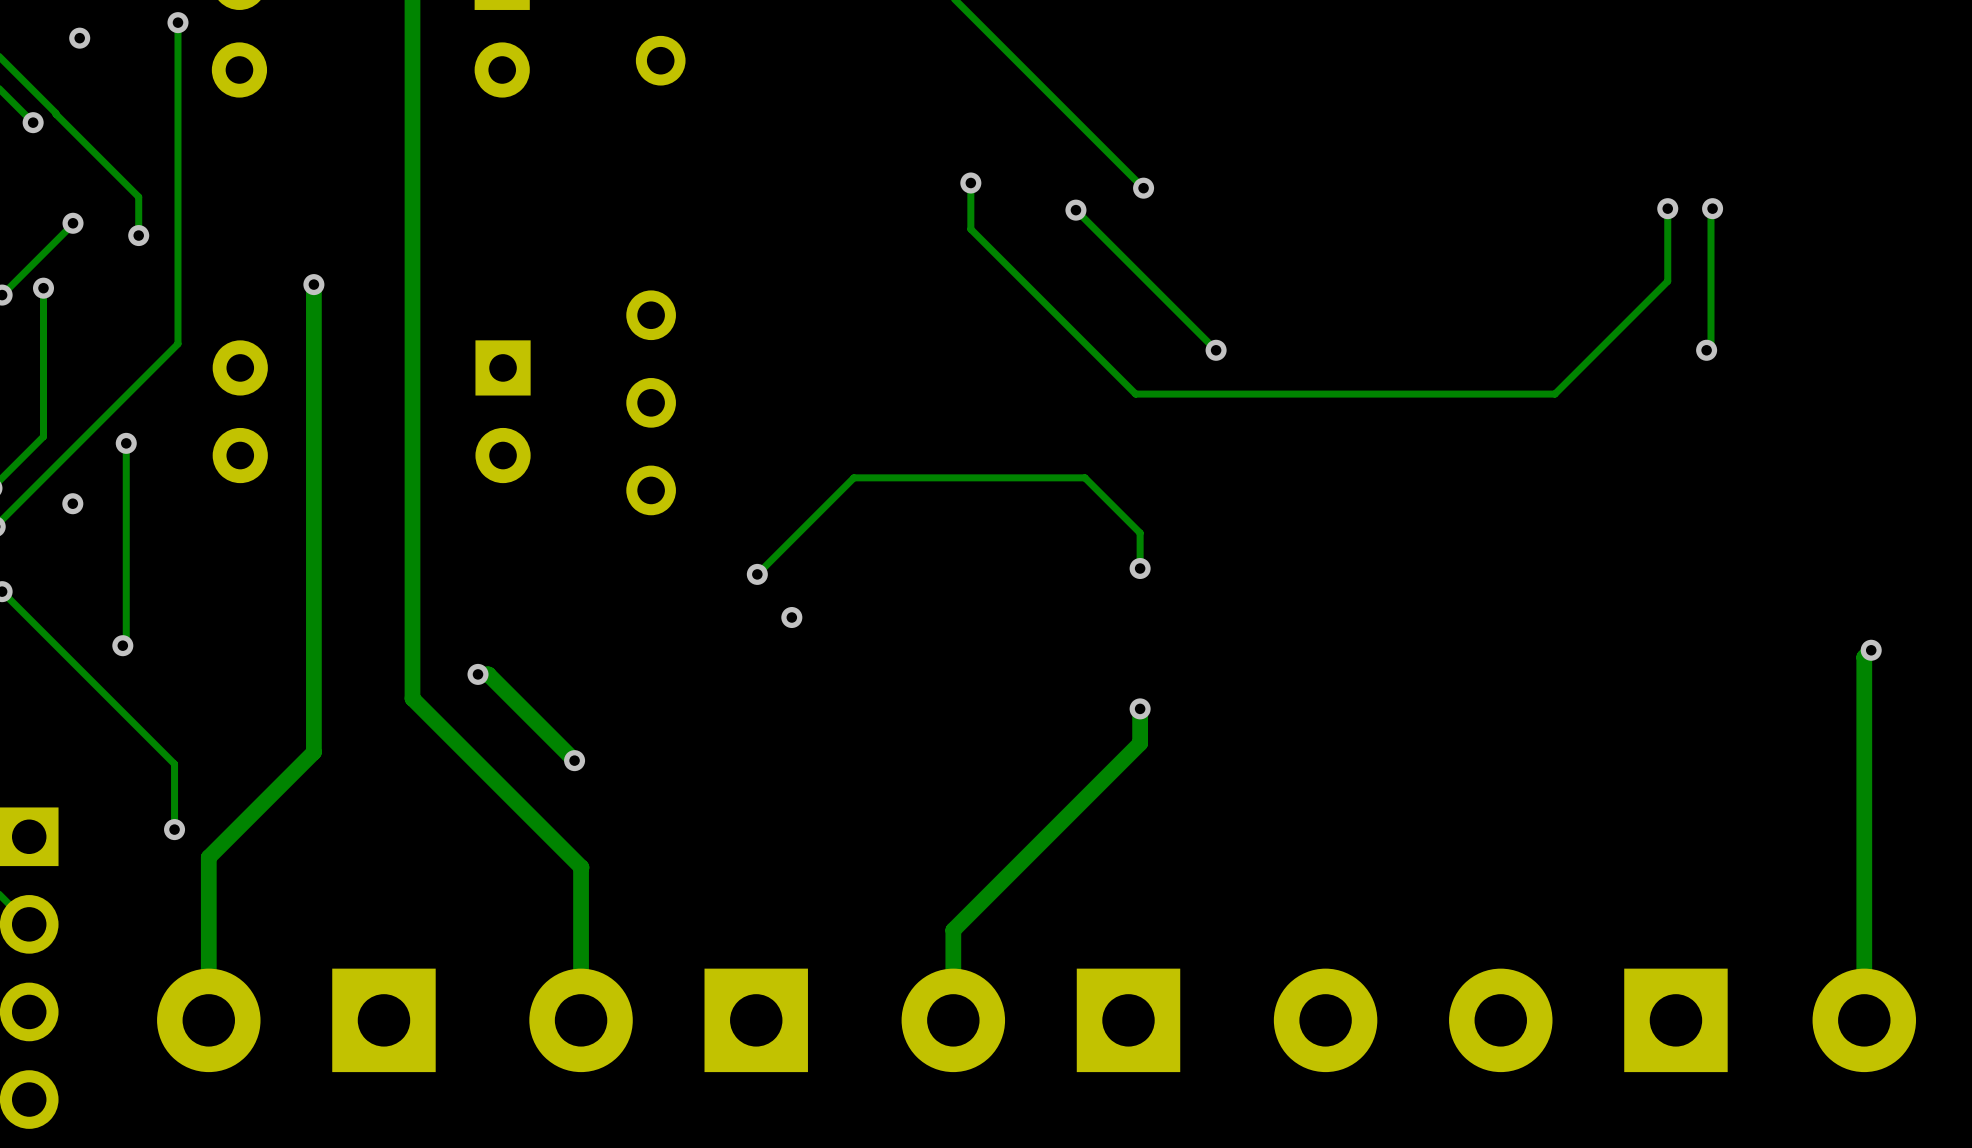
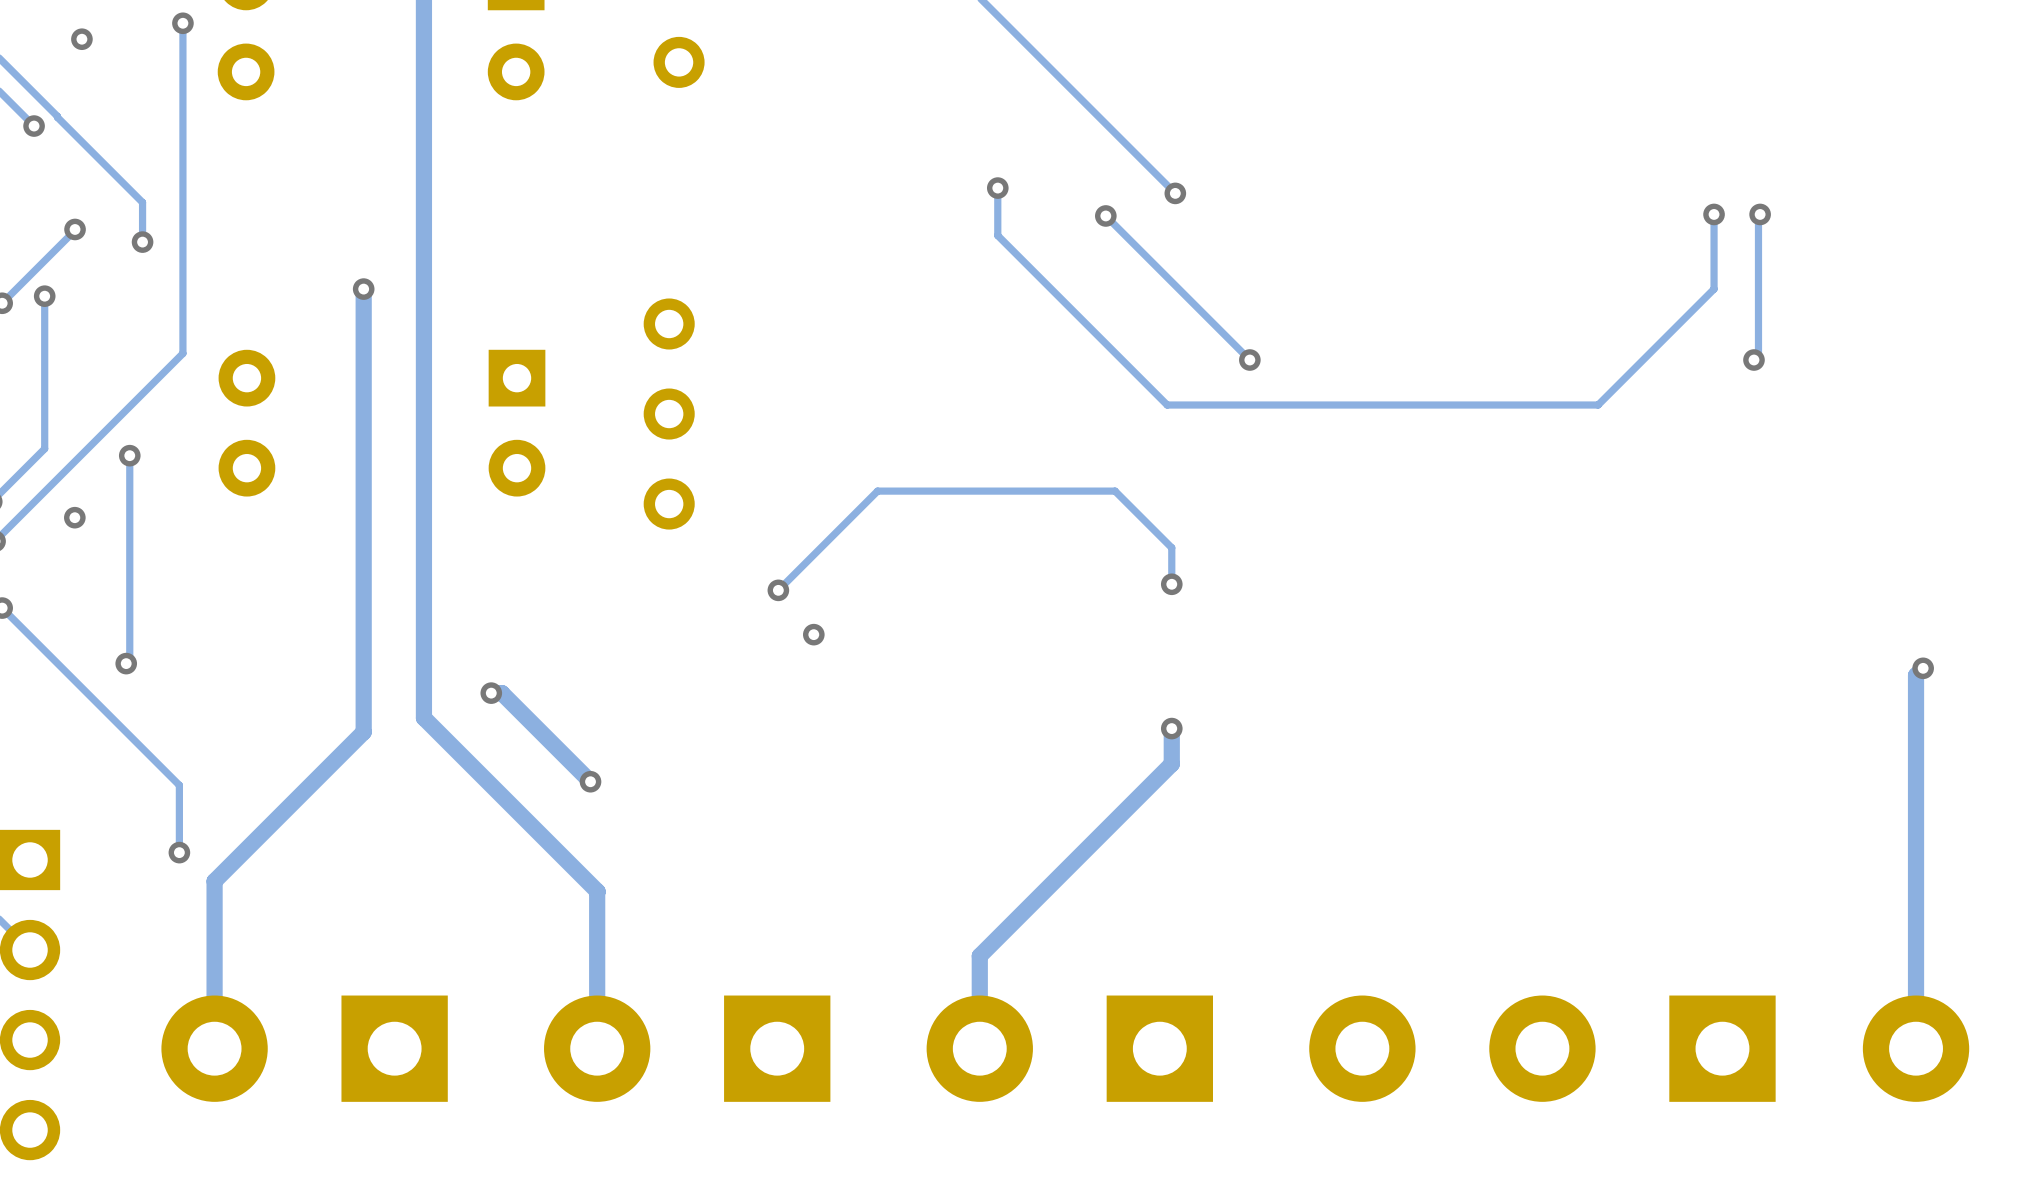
track: (313, 284) (313, 752) -> (363, 289) (363, 732) (322, 773)
via position: (313, 284) -> (363, 289)

